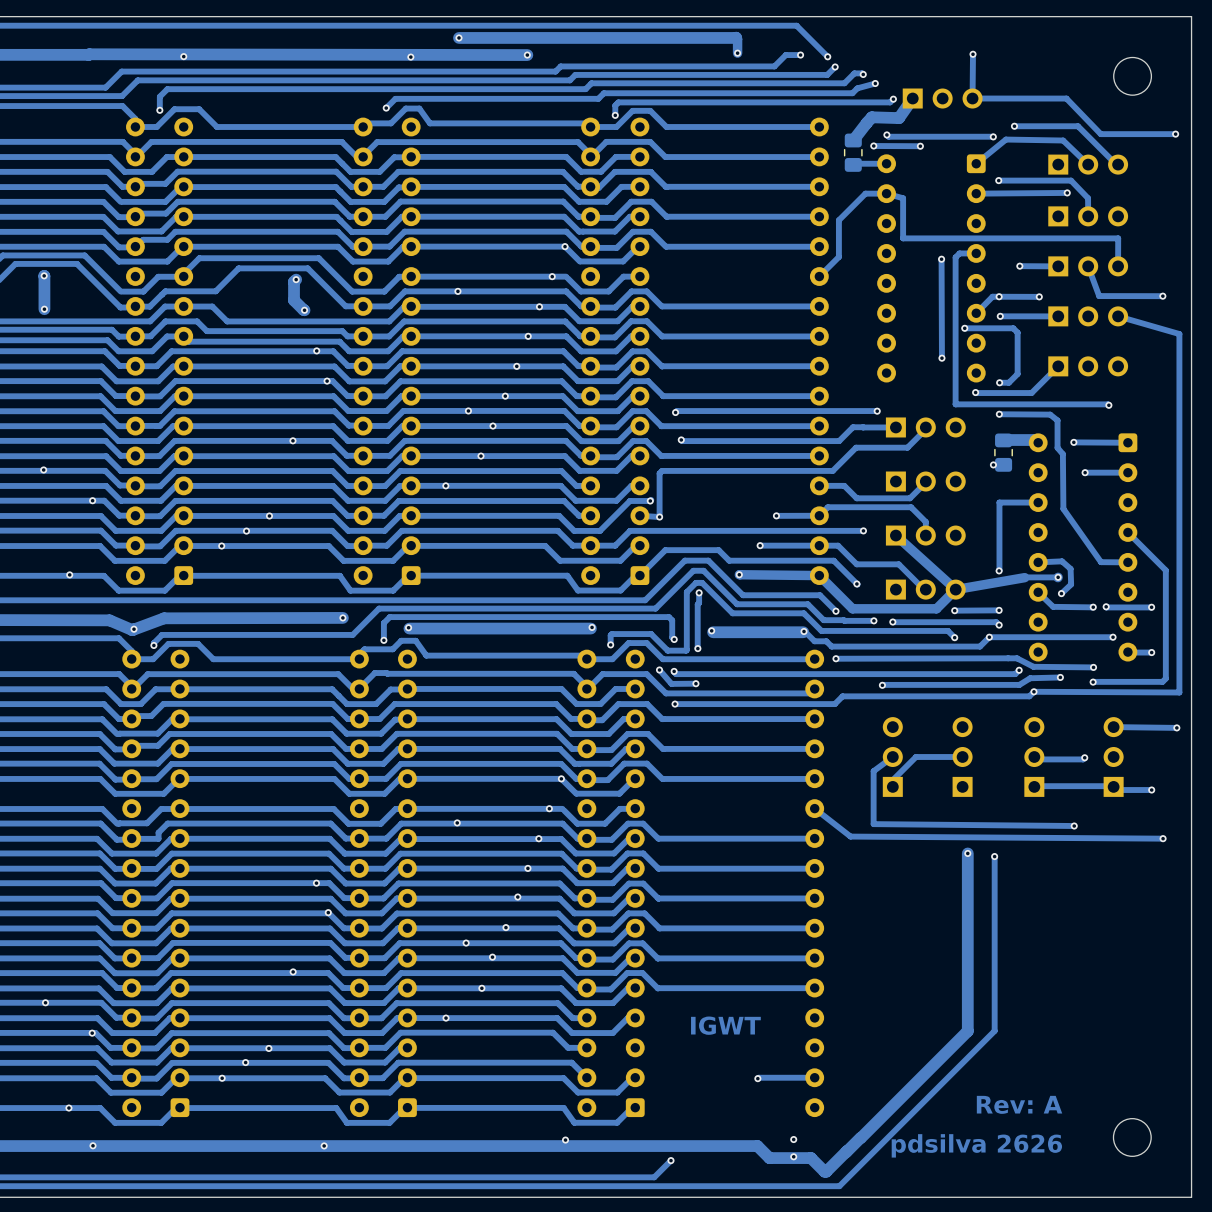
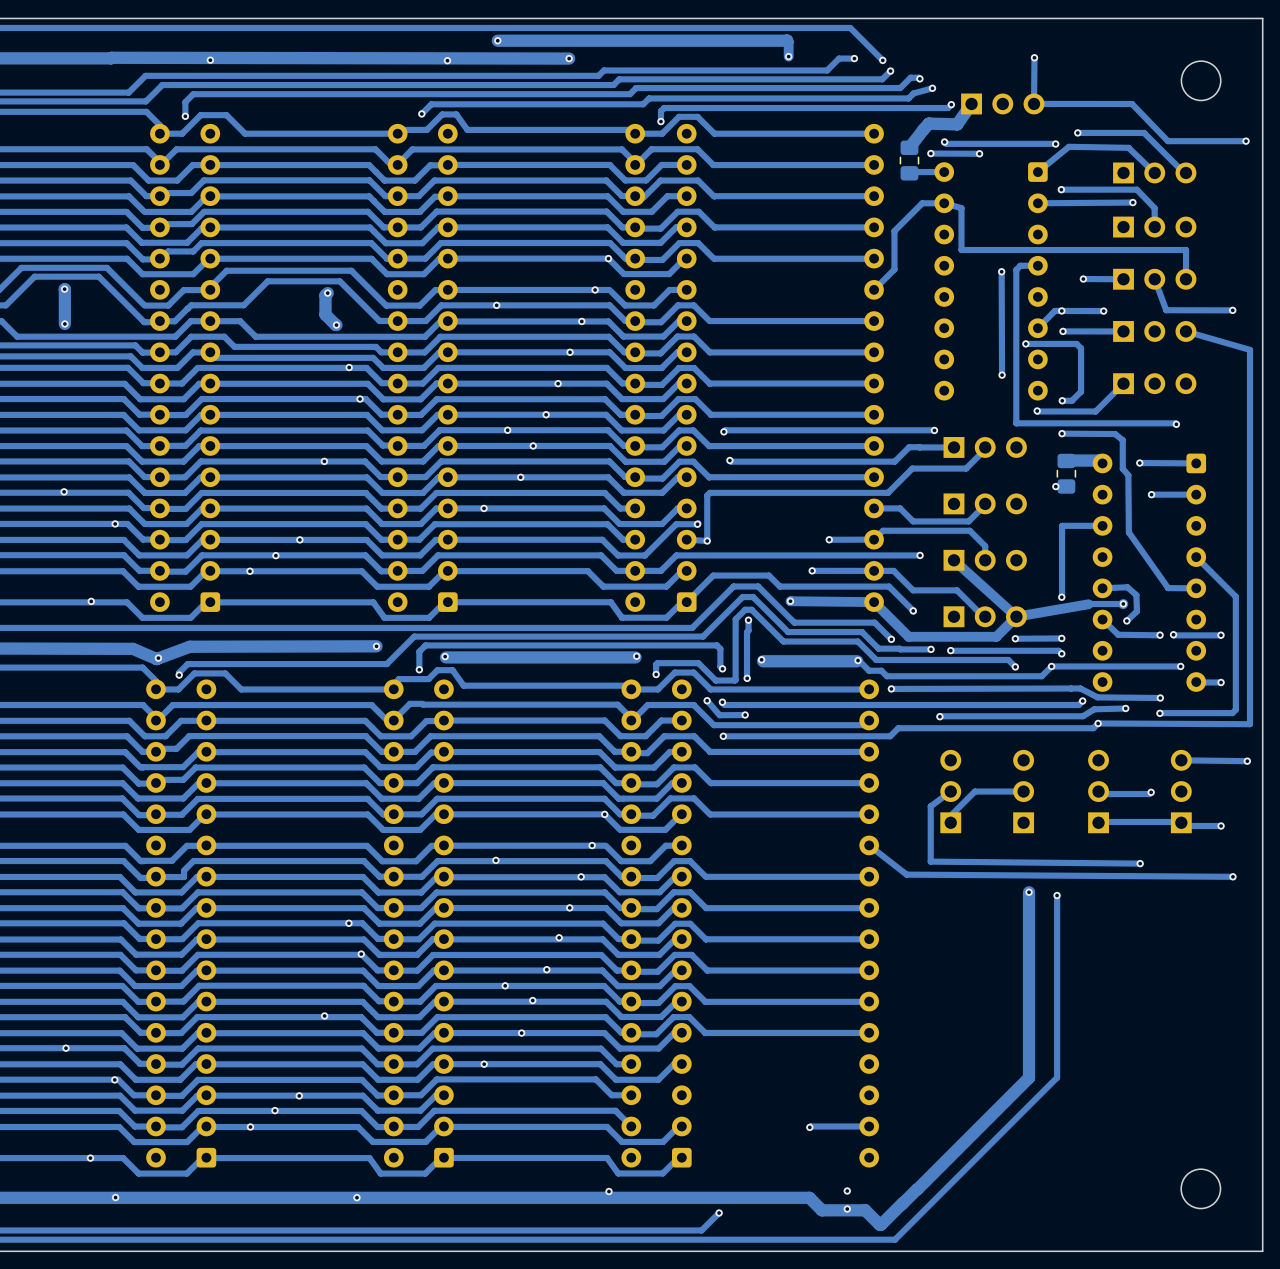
text: IGWT (725, 1025) -> none
text: Rev: A (1019, 1104) -> none
text: pdsilva 2626 (976, 1145) -> none

